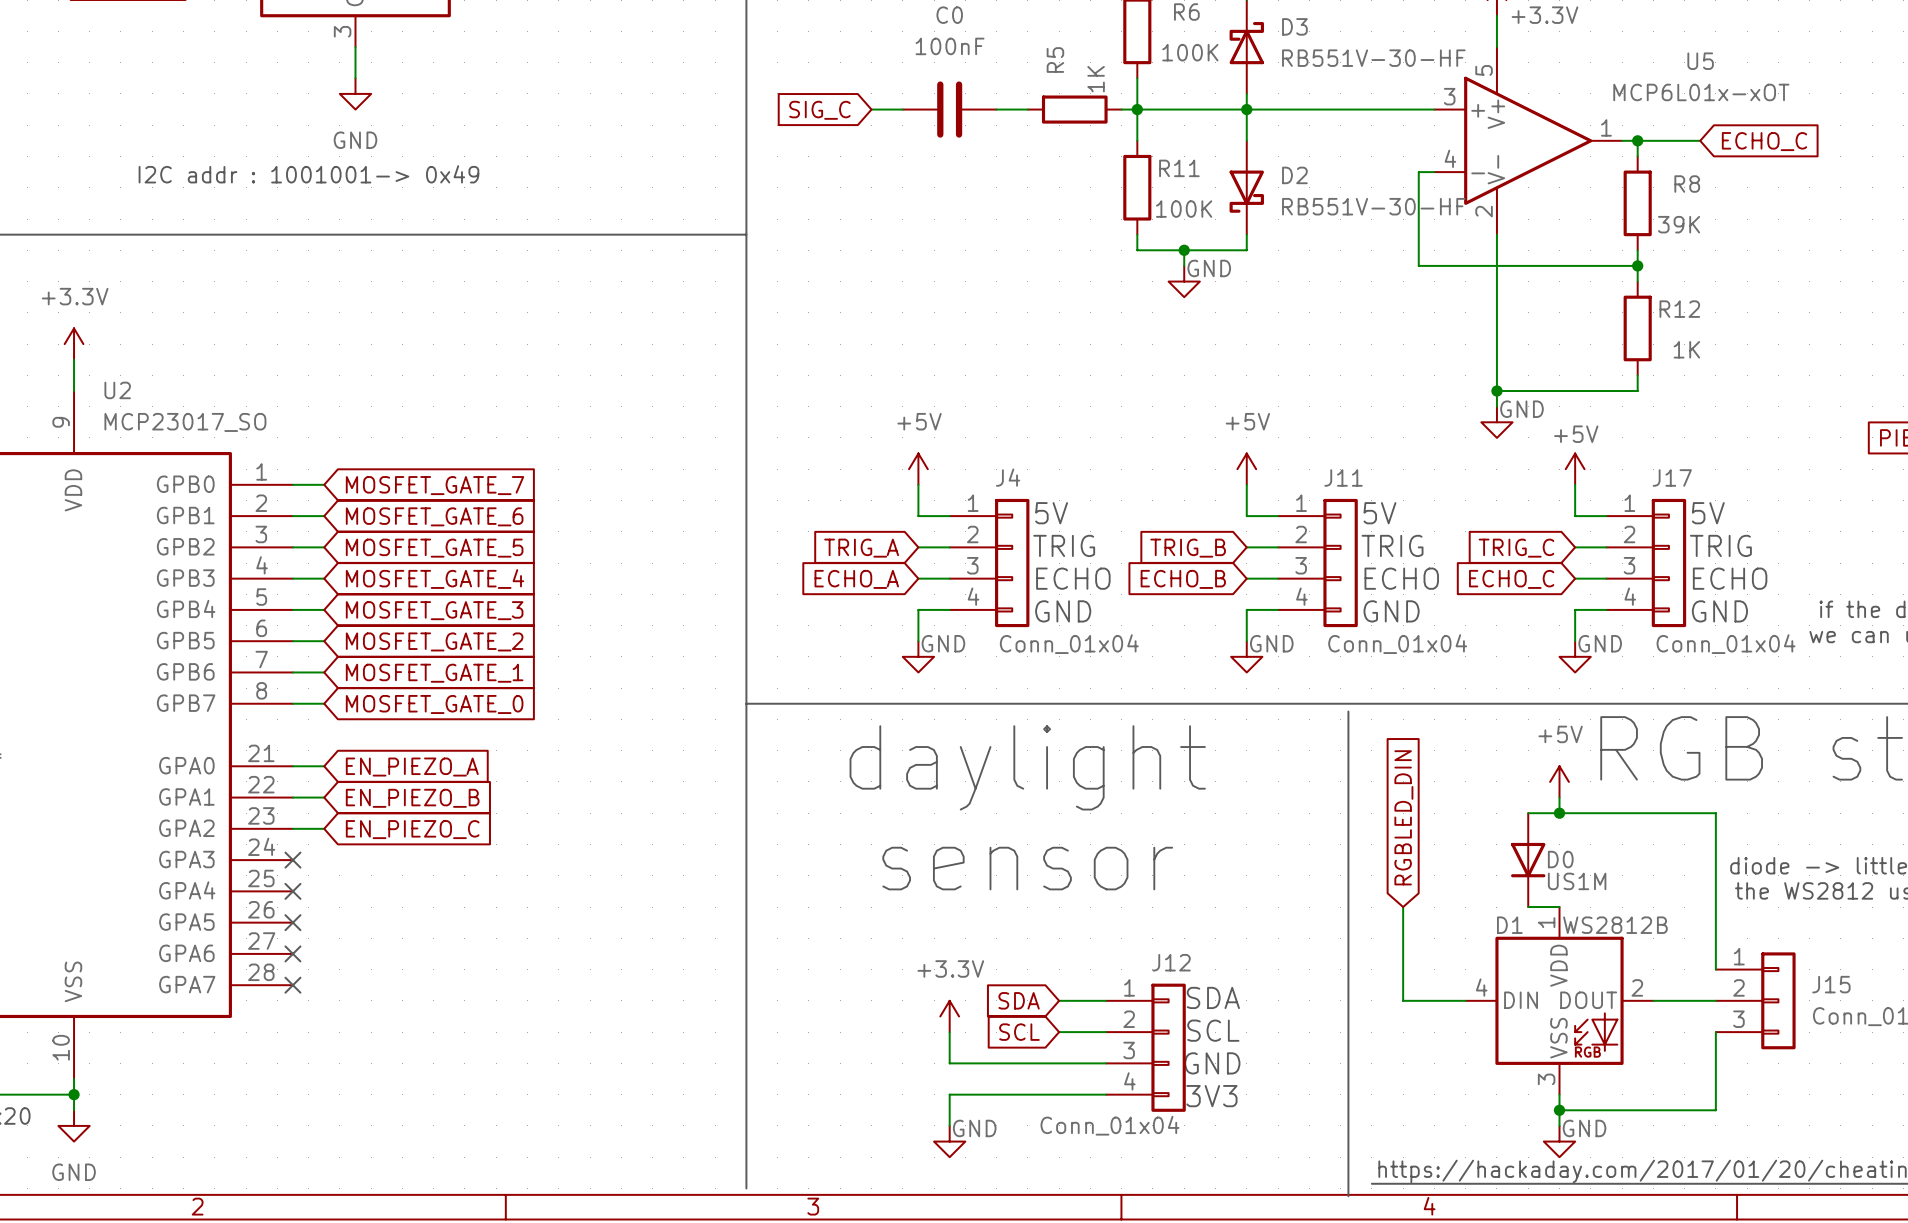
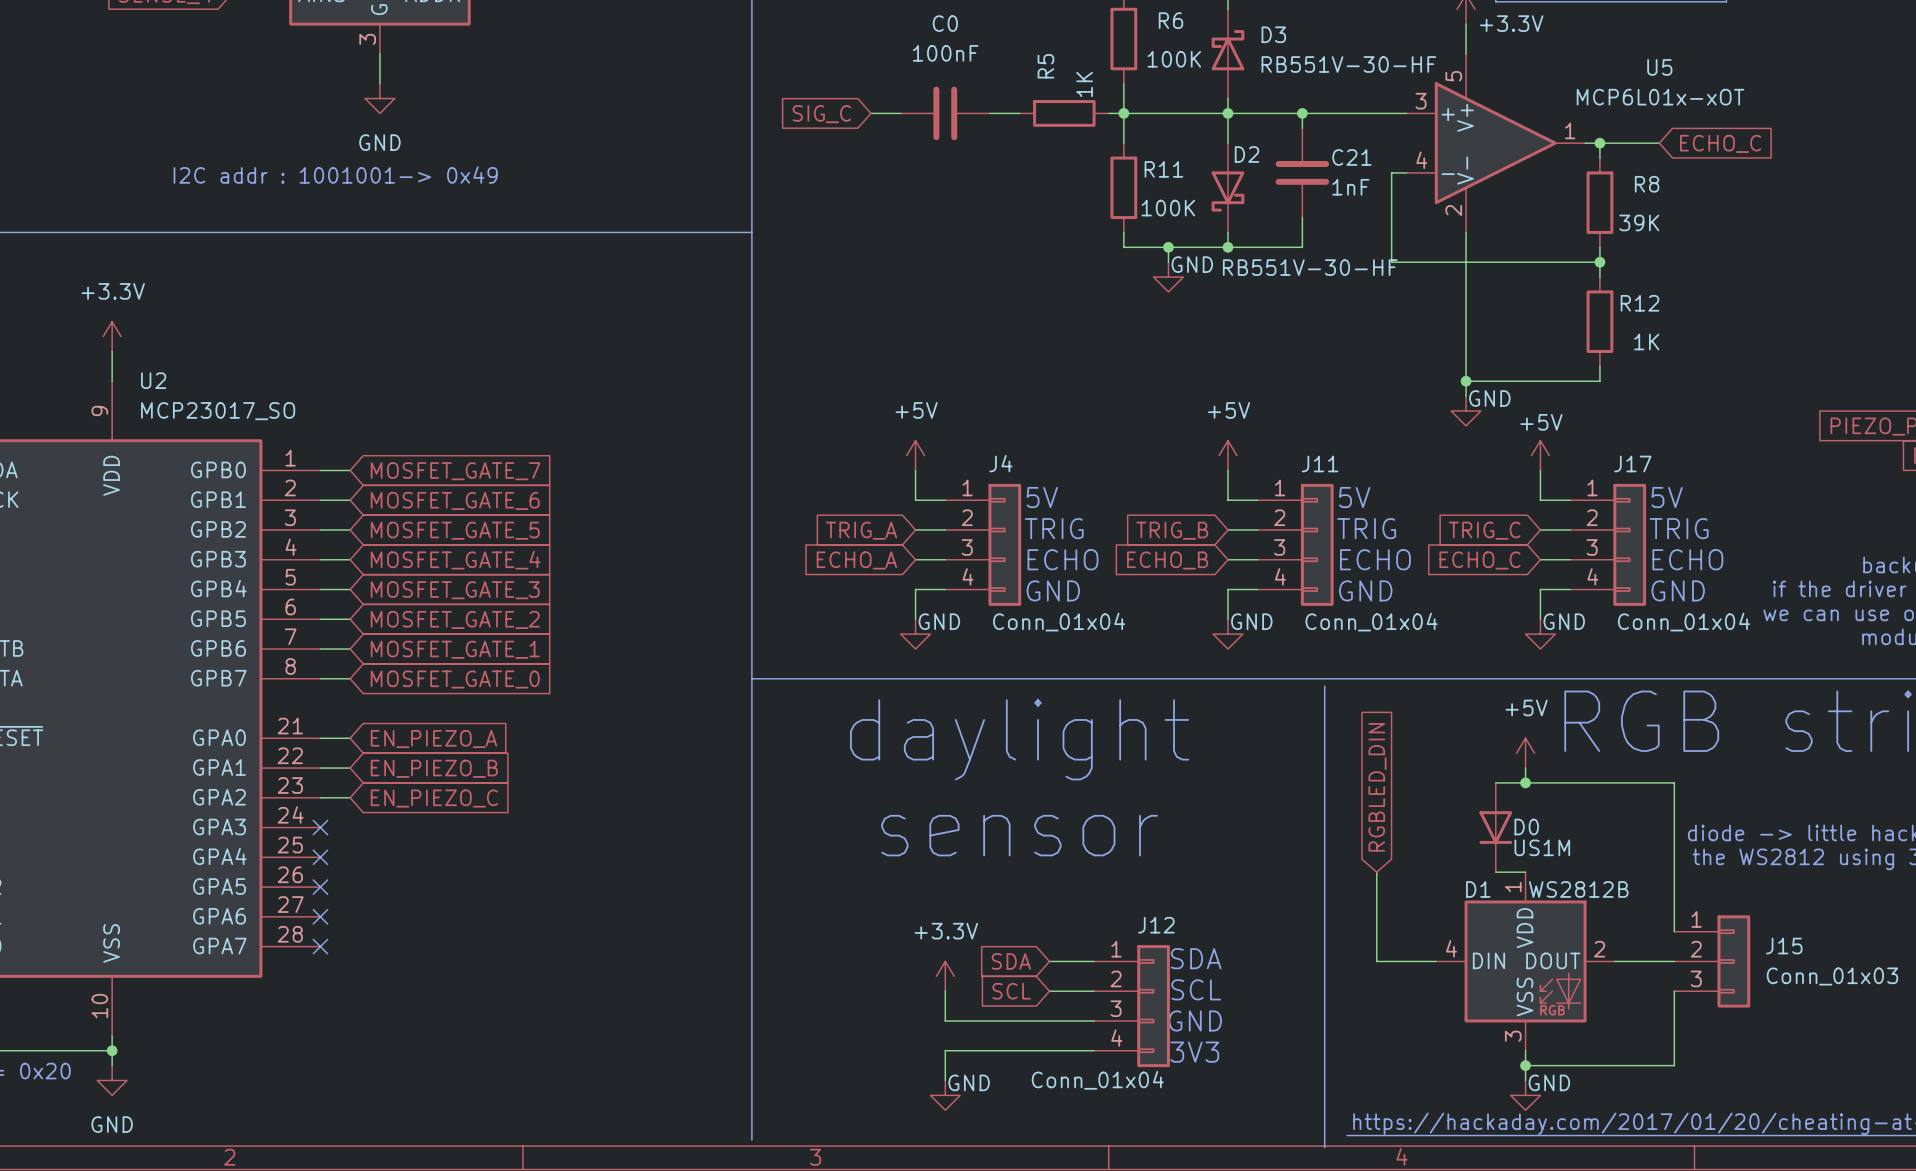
wire: none -> (1302, 113) (1302, 128)
junction: none -> (1302, 113)
C21: none -> 1nF (1302, 172)
D2 name position: D2 (1294, 175) -> D2 (1247, 154)
D2 value position: RB551V-30-HF (1373, 206) -> RB551V-30-HF (1310, 267)
wire: none -> (1302, 217) (1302, 247) (1227, 247)
junction: none -> (1227, 247)

